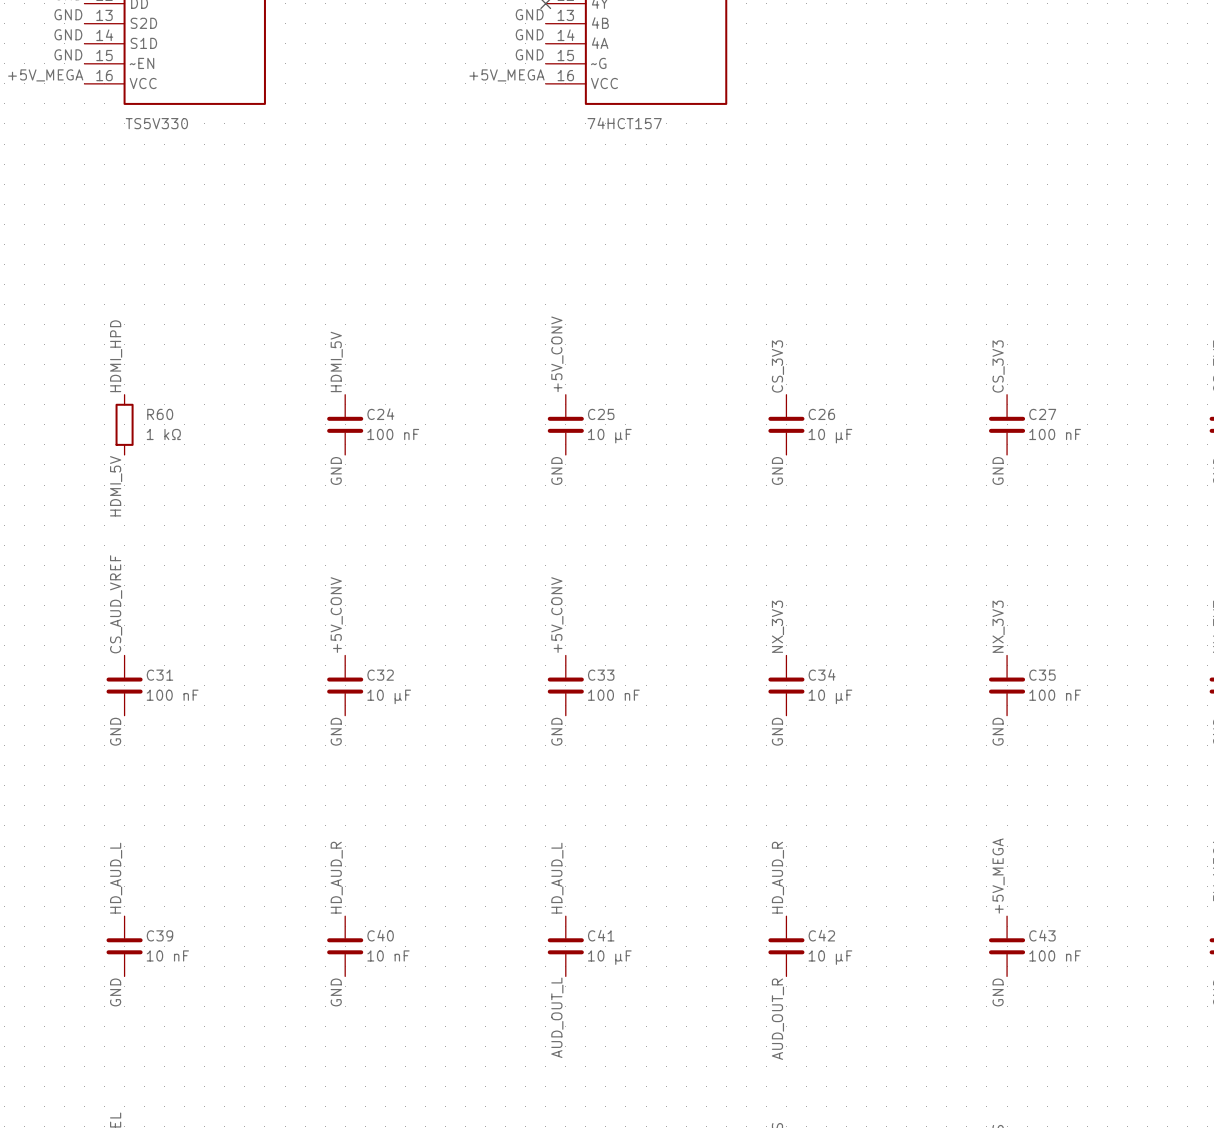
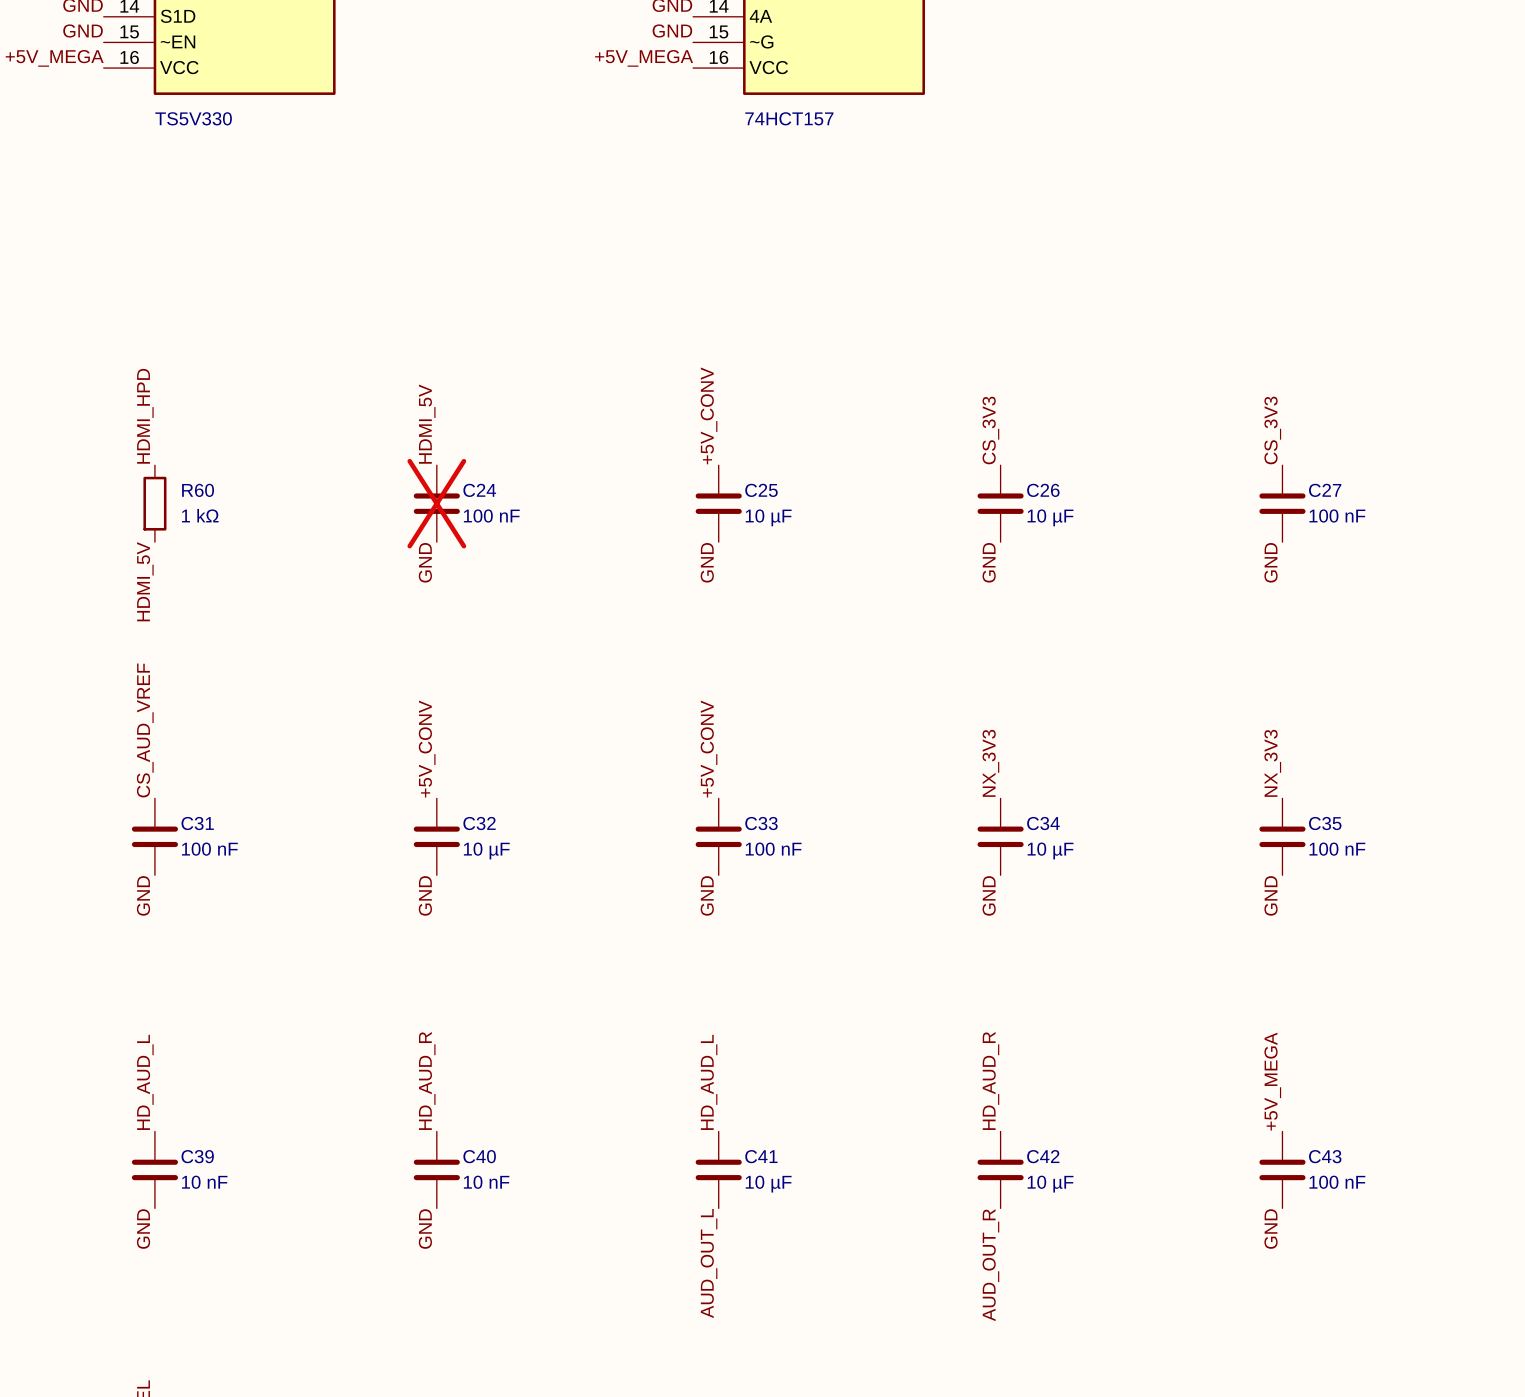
C24 do-not-place cross: none -> (436, 503)

